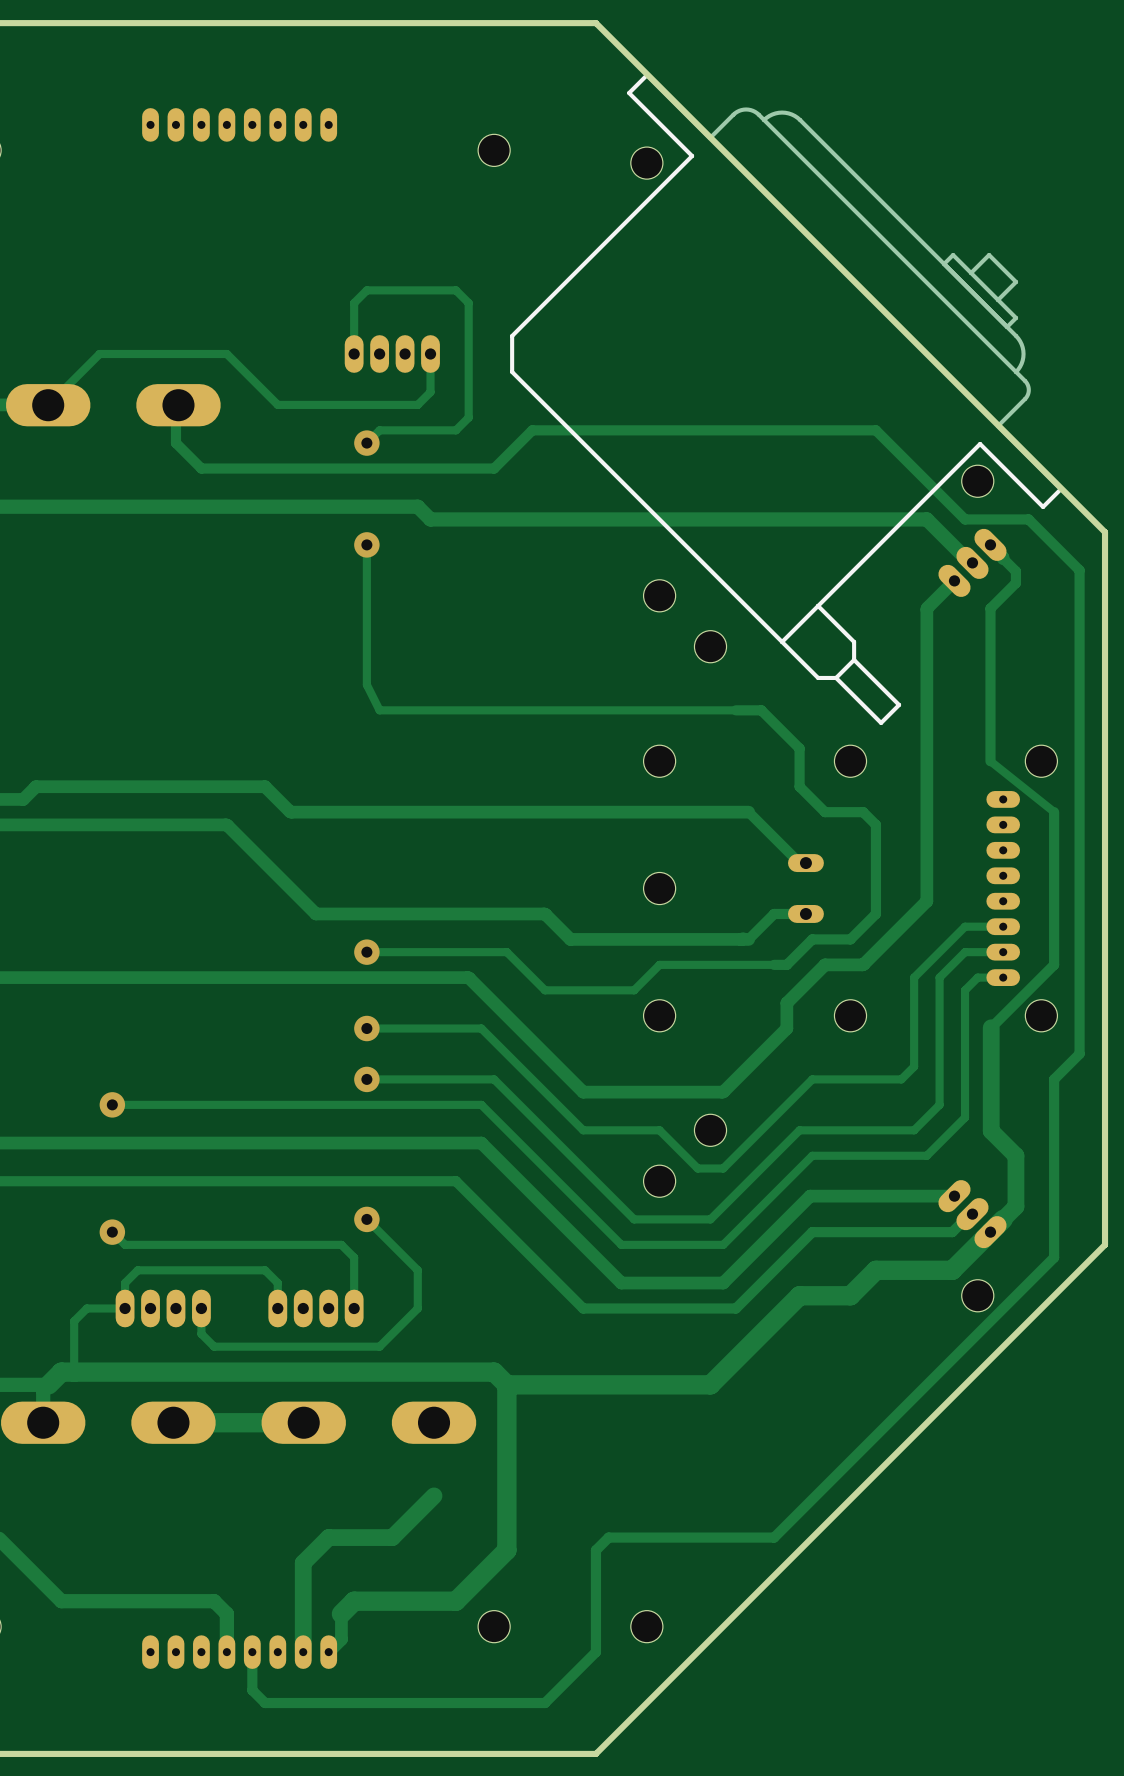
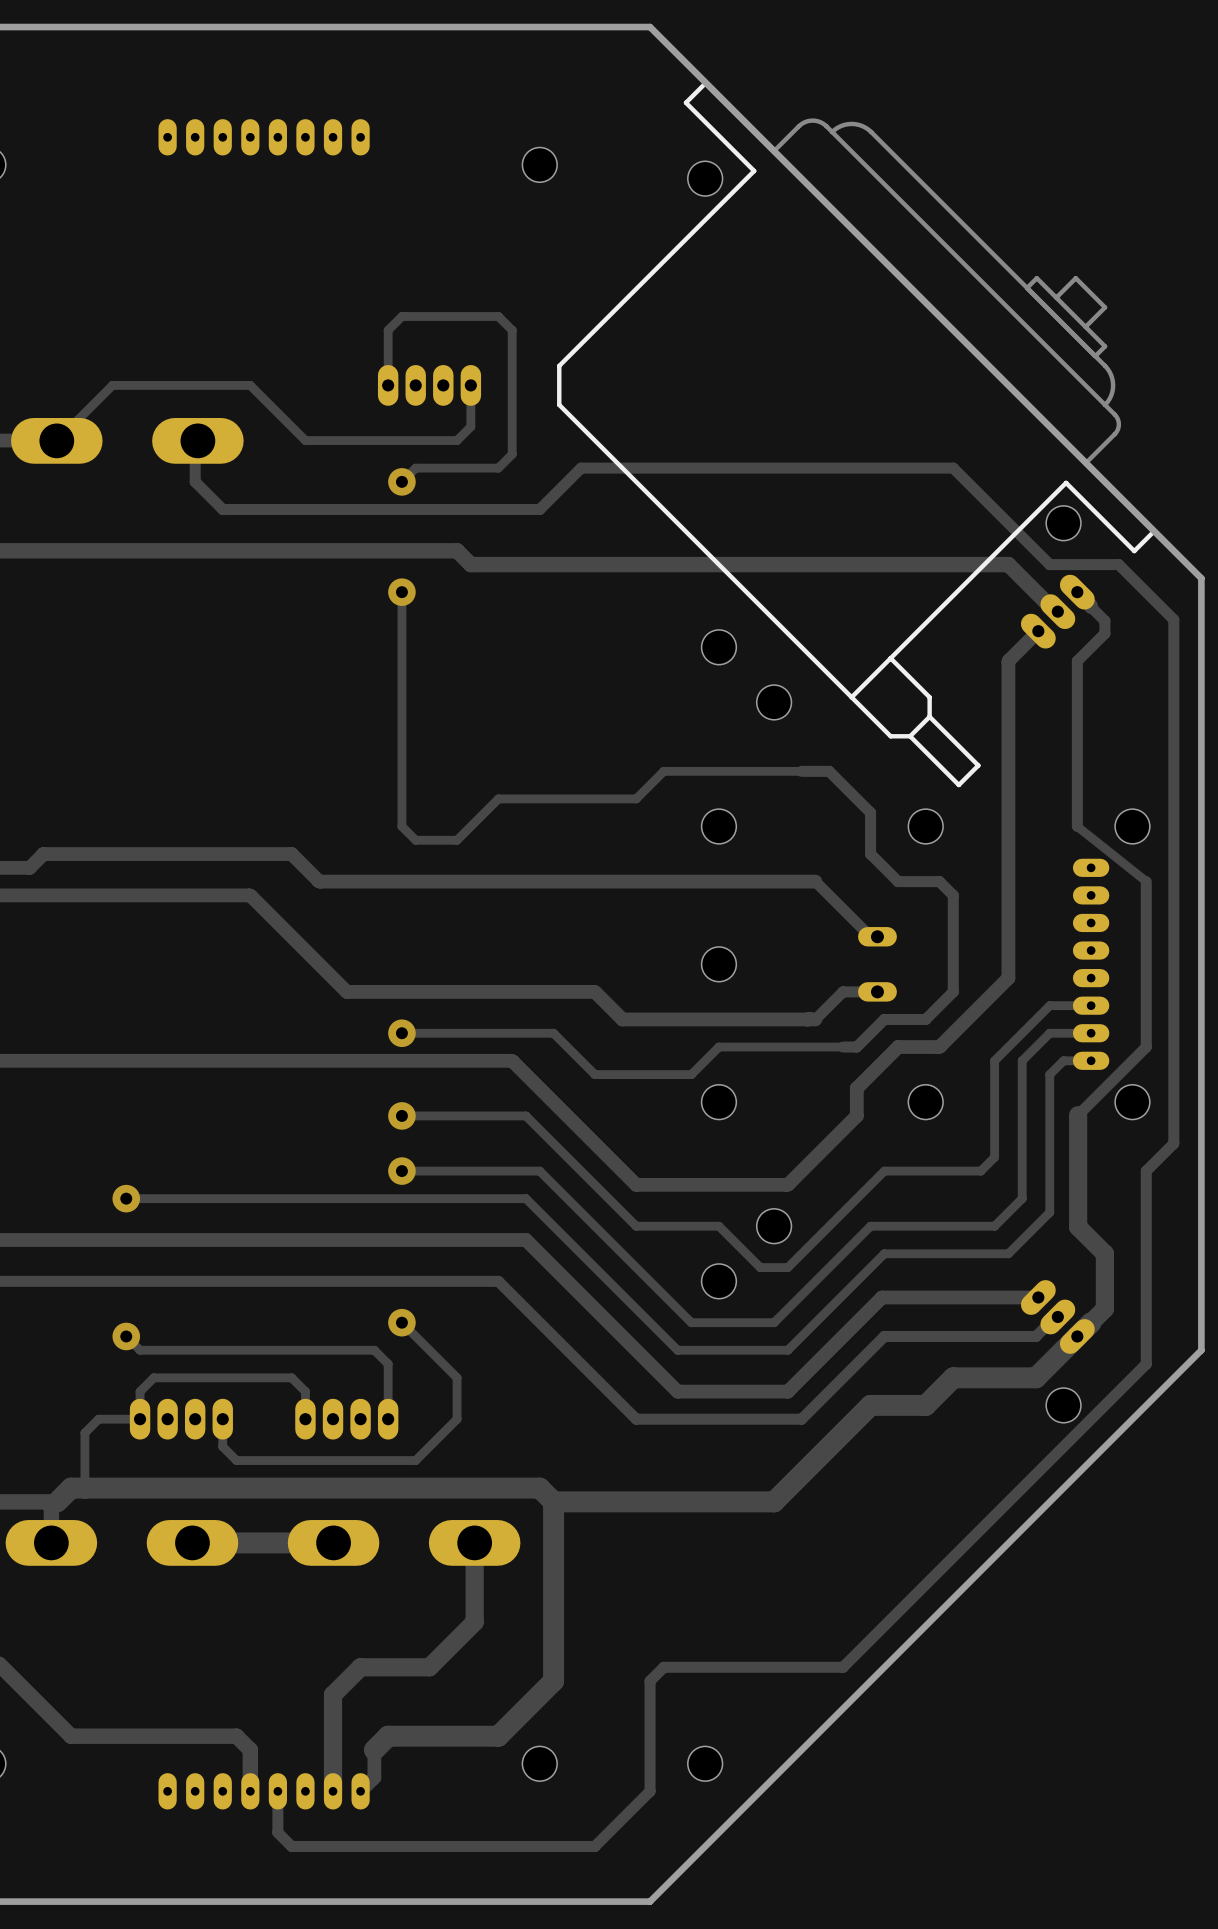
track: (366, 684) (379, 710) (608, 710) -> (401, 743) (401, 826) (415, 840) (457, 840) (498, 798) (636, 798) (663, 771)
track: none -> (474, 1542) (474, 1622)

